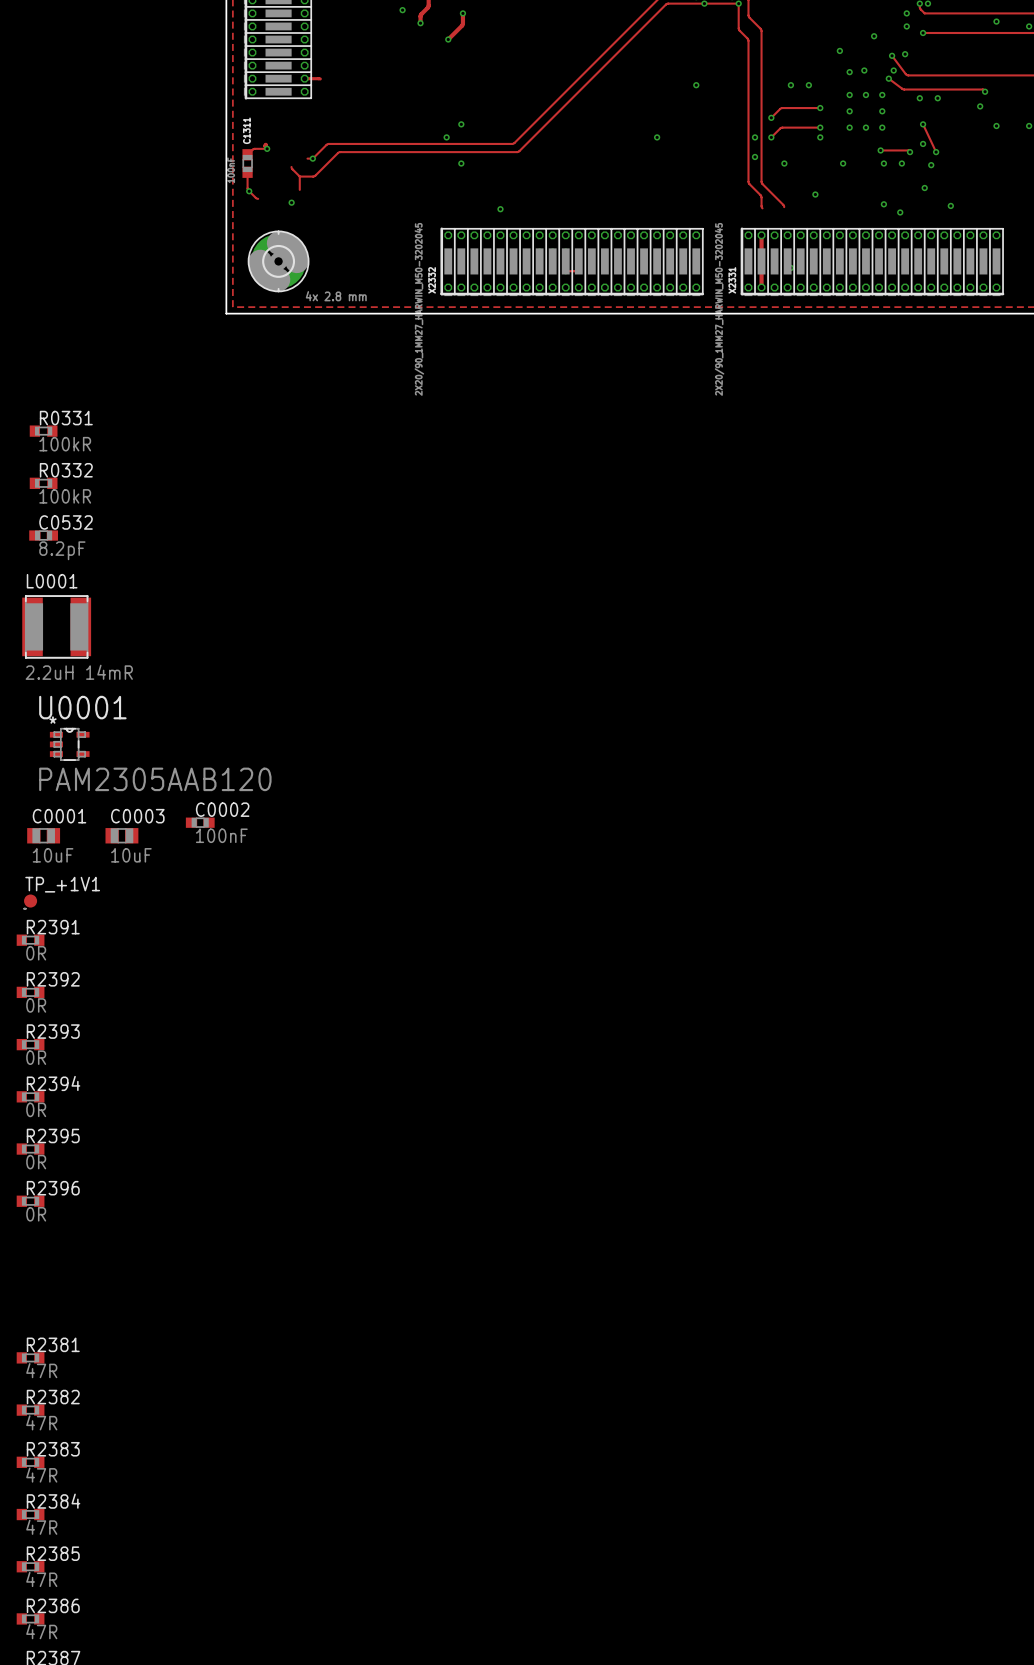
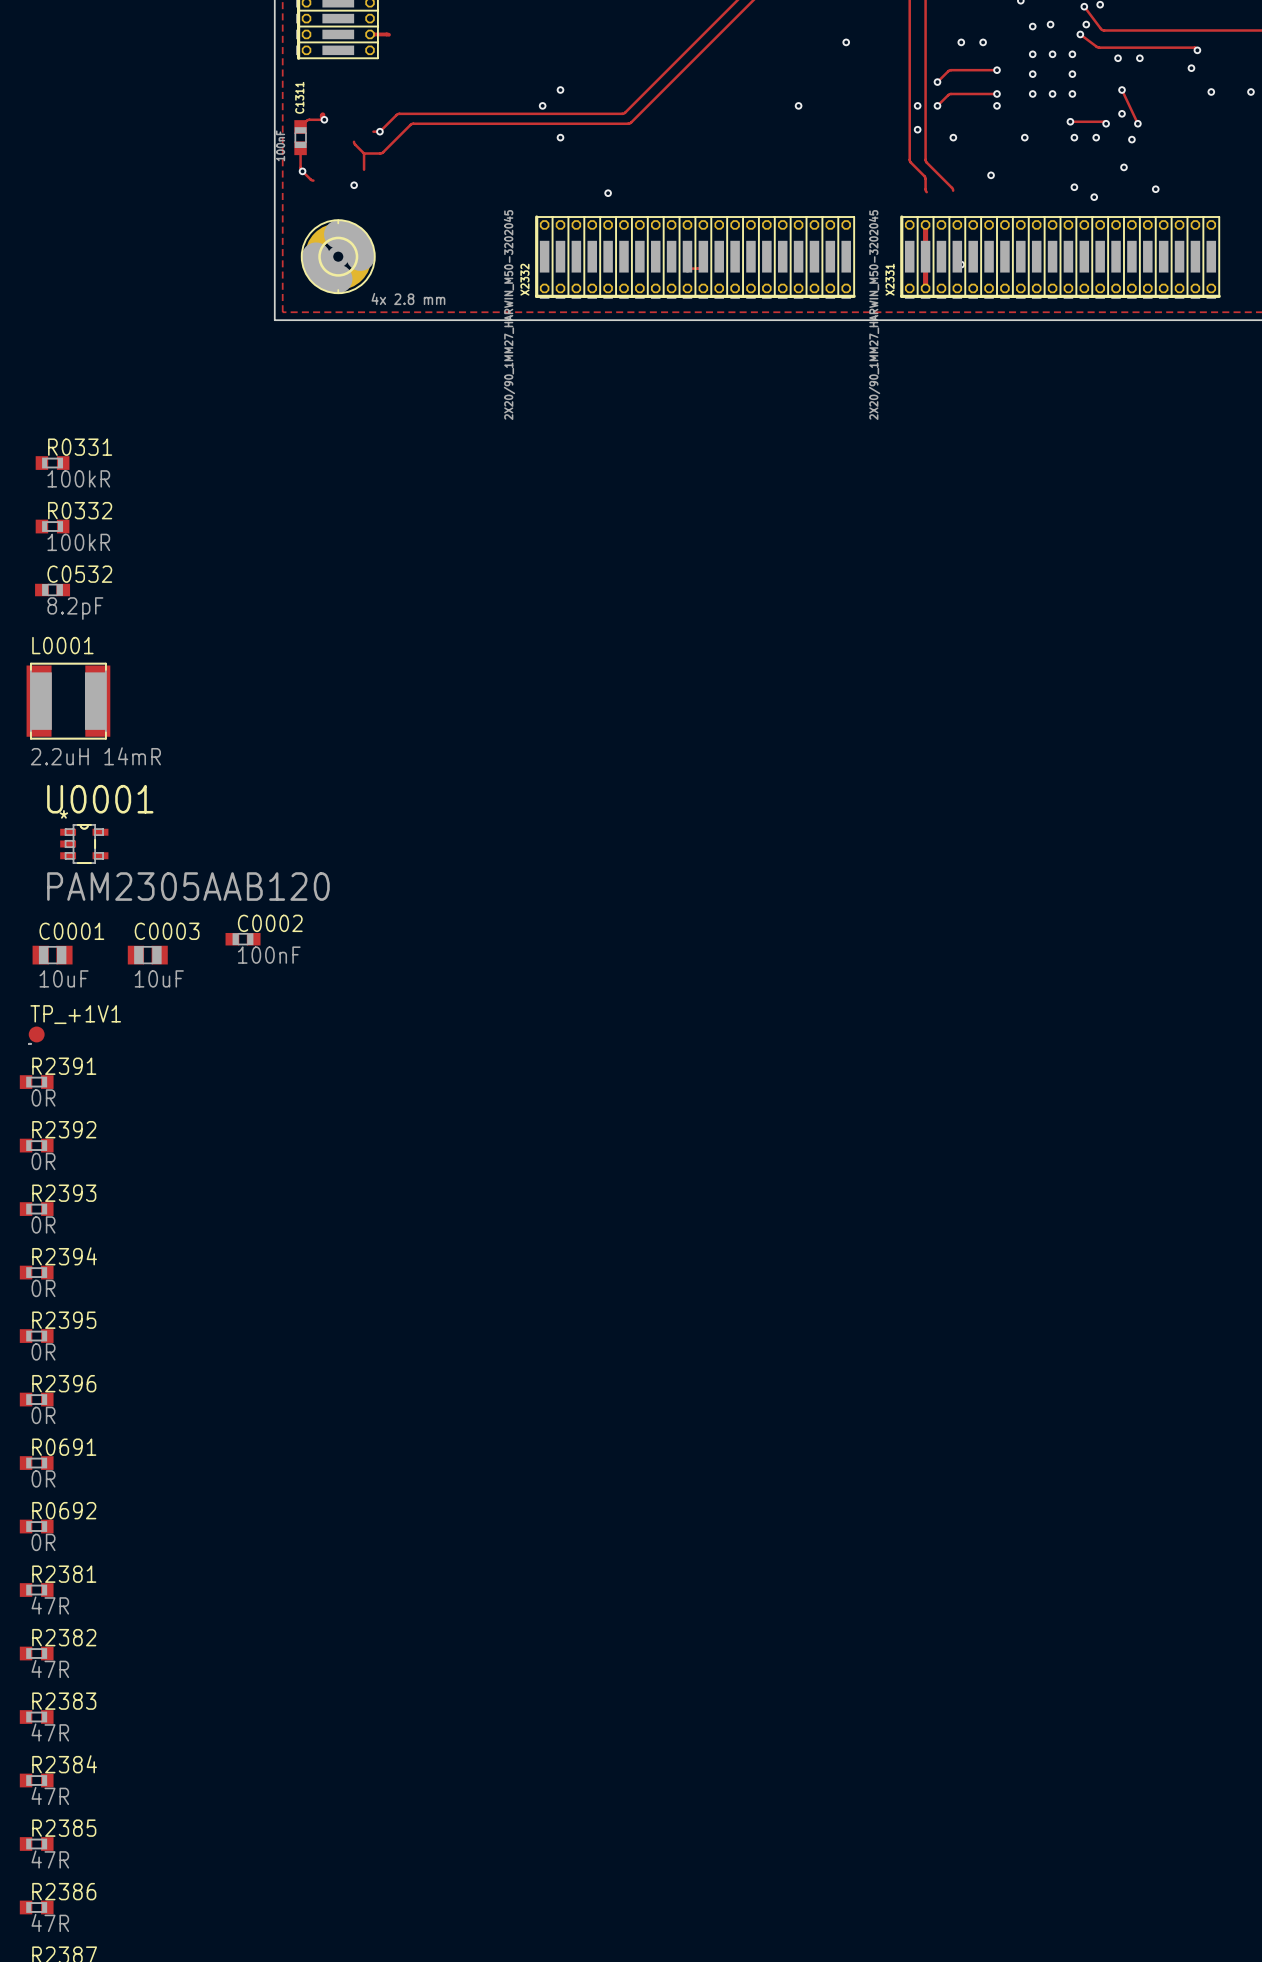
R0691: none -> 0R (36, 1463)
R0692: none -> 0R (36, 1526)

